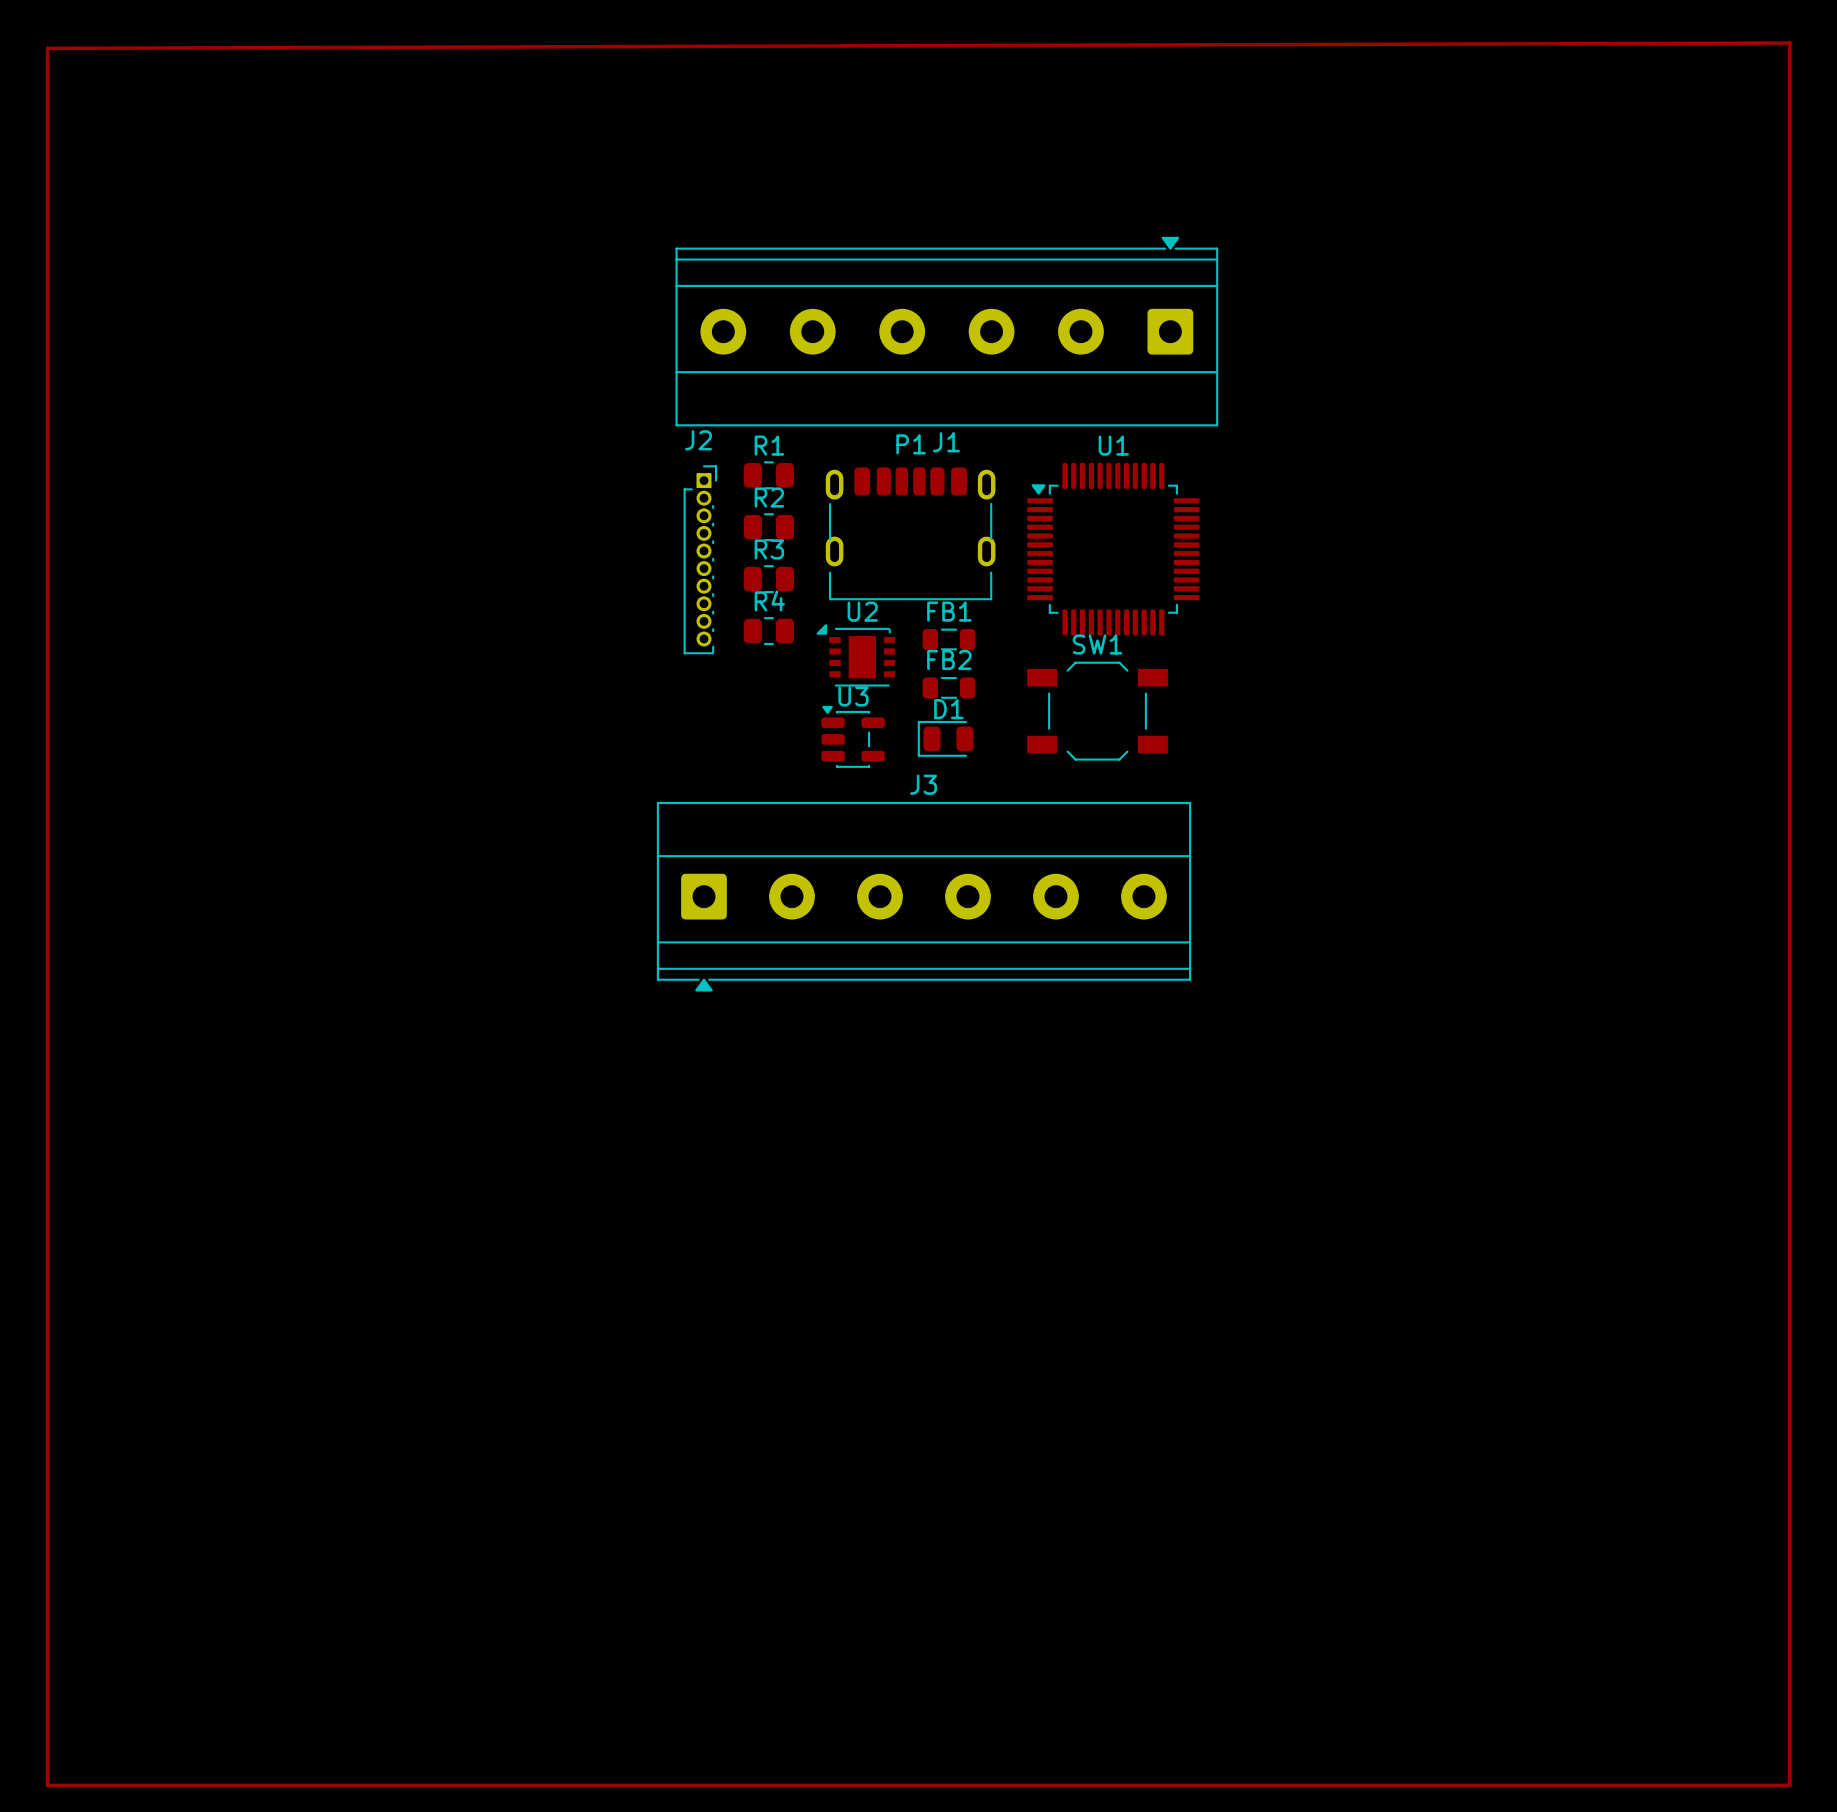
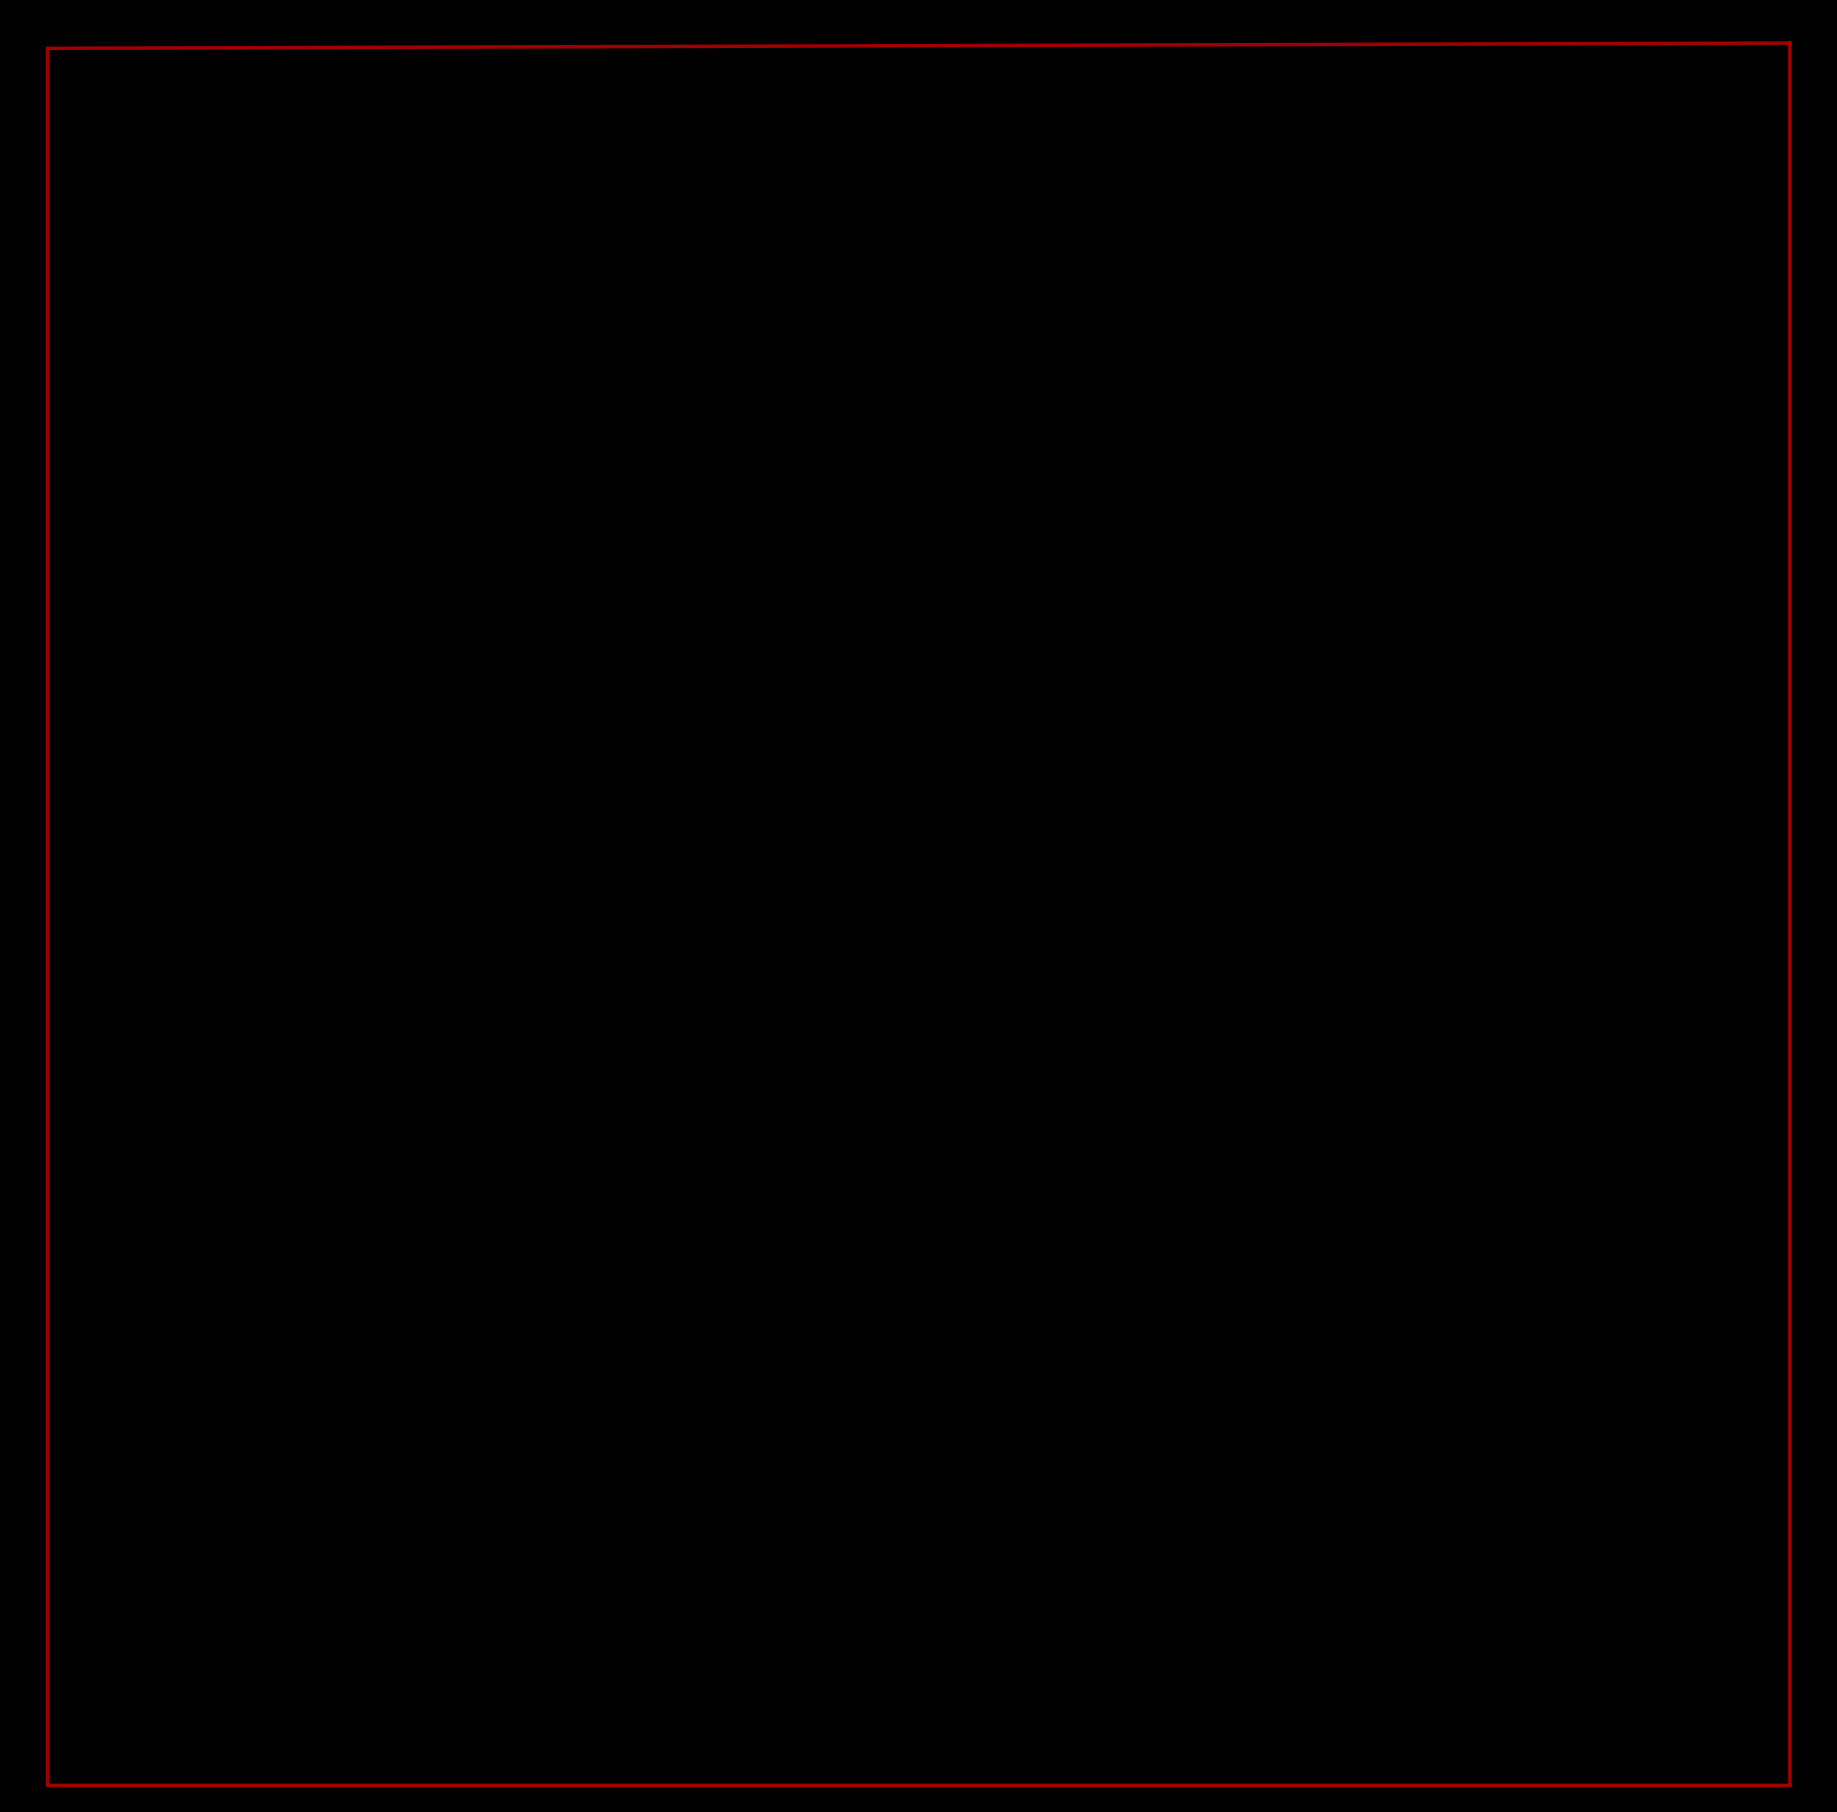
J1: (946, 331) -> none
R1: (768, 475) -> none
R2: (768, 527) -> none
P1: (910, 533) -> none
U1: (1113, 549) -> none
J2: (700, 559) -> none
R3: (768, 579) -> none
R4: (768, 631) -> none
FB1: (948, 639) -> none
U2: (855, 655) -> none
FB2: (948, 687) -> none
SW1: (1097, 711) -> none
U3: (853, 736) -> none
D1: (945, 738) -> none
J3: (923, 896) -> none

